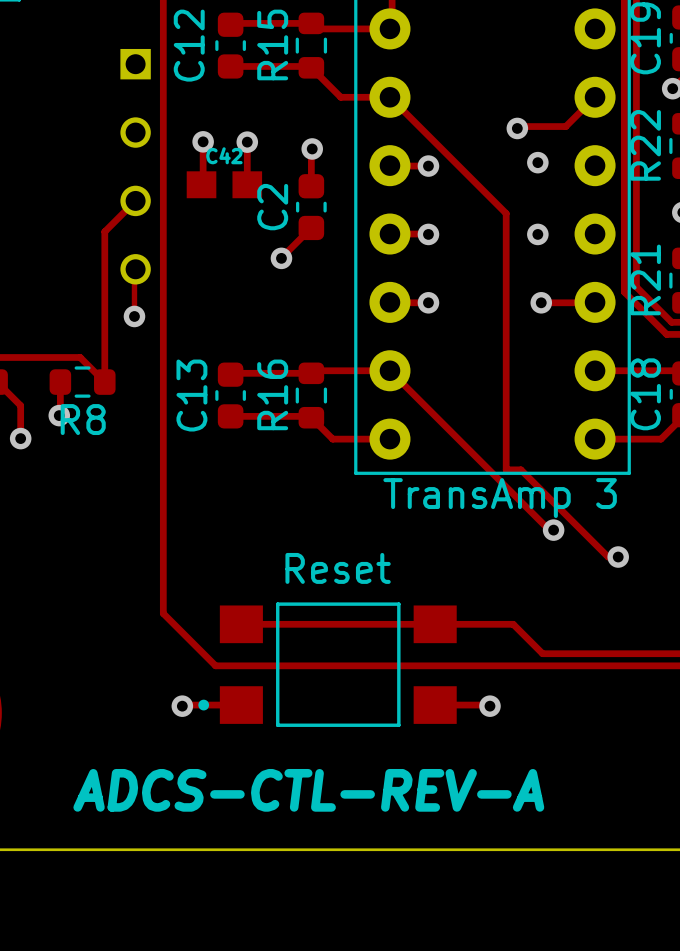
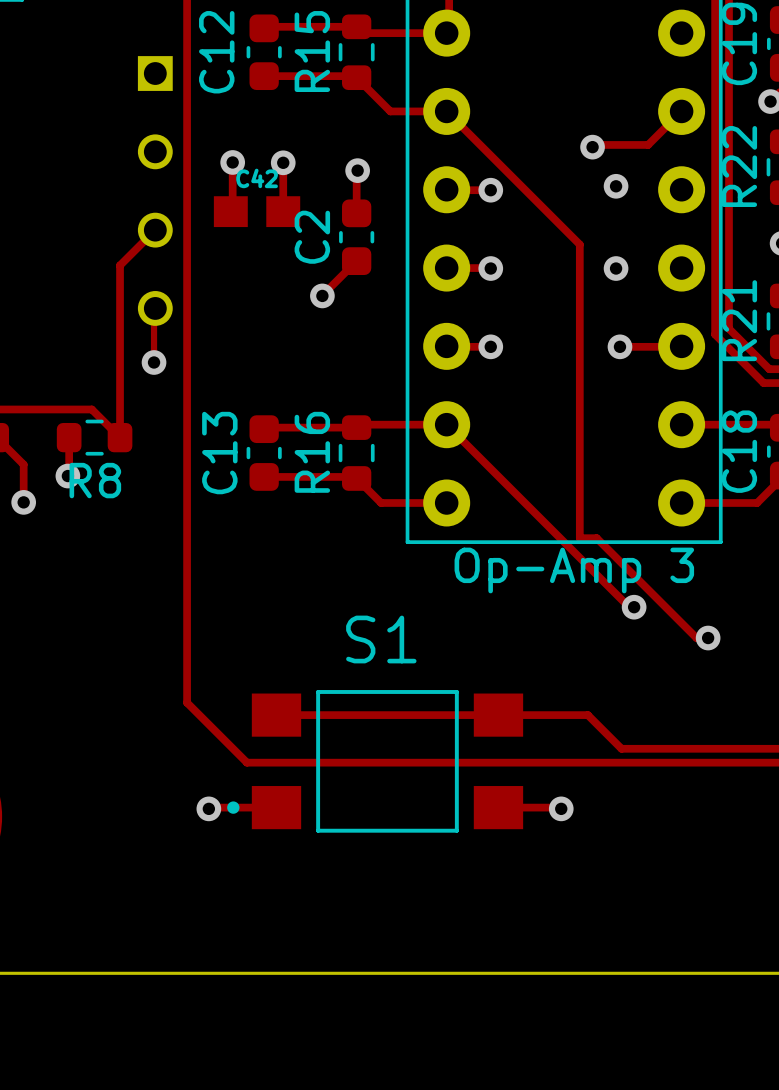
part text: TransAmp 3 (500, 498) -> Op-Amp 3 (574, 570)
S1 name: none -> S1 (381, 639)
text: Reset (338, 568) -> none
text: ADCS-CTL-REV-A (308, 790) -> none

